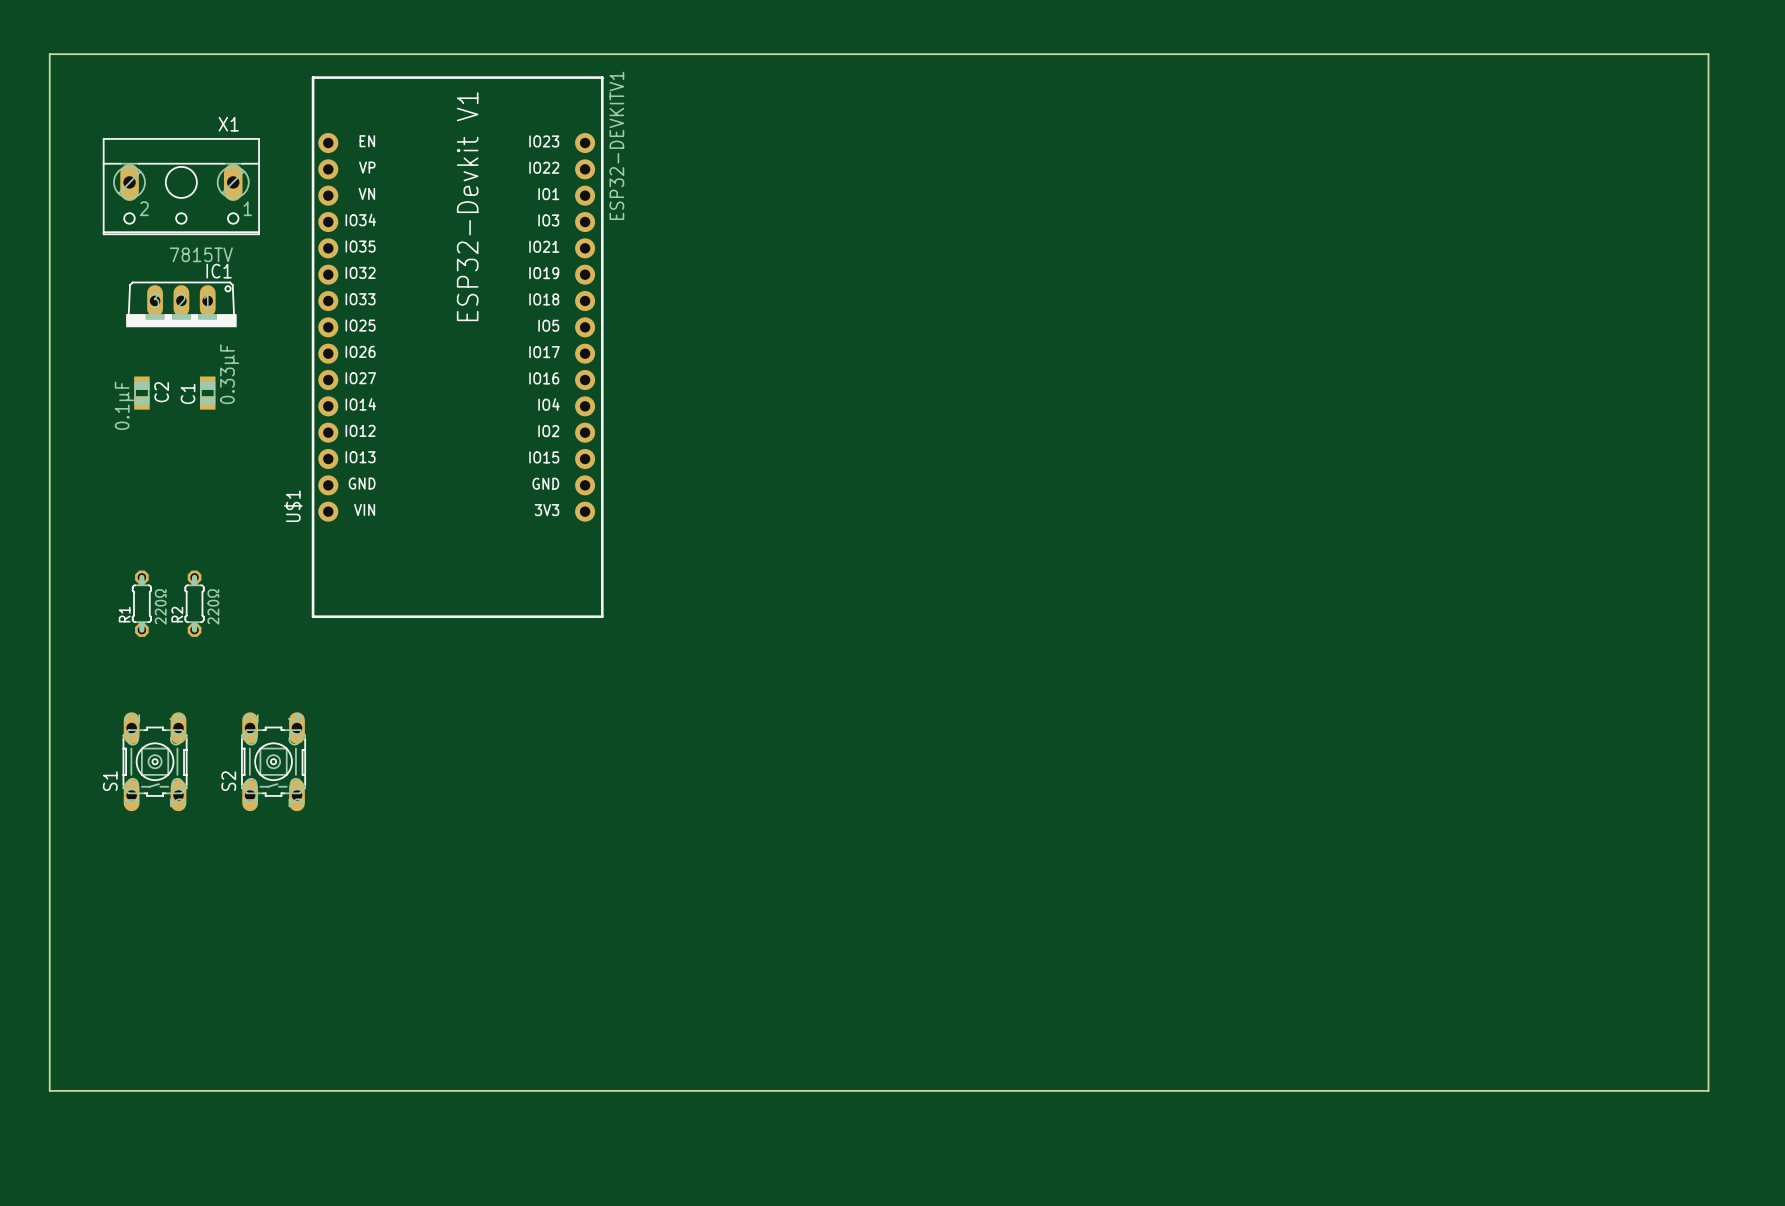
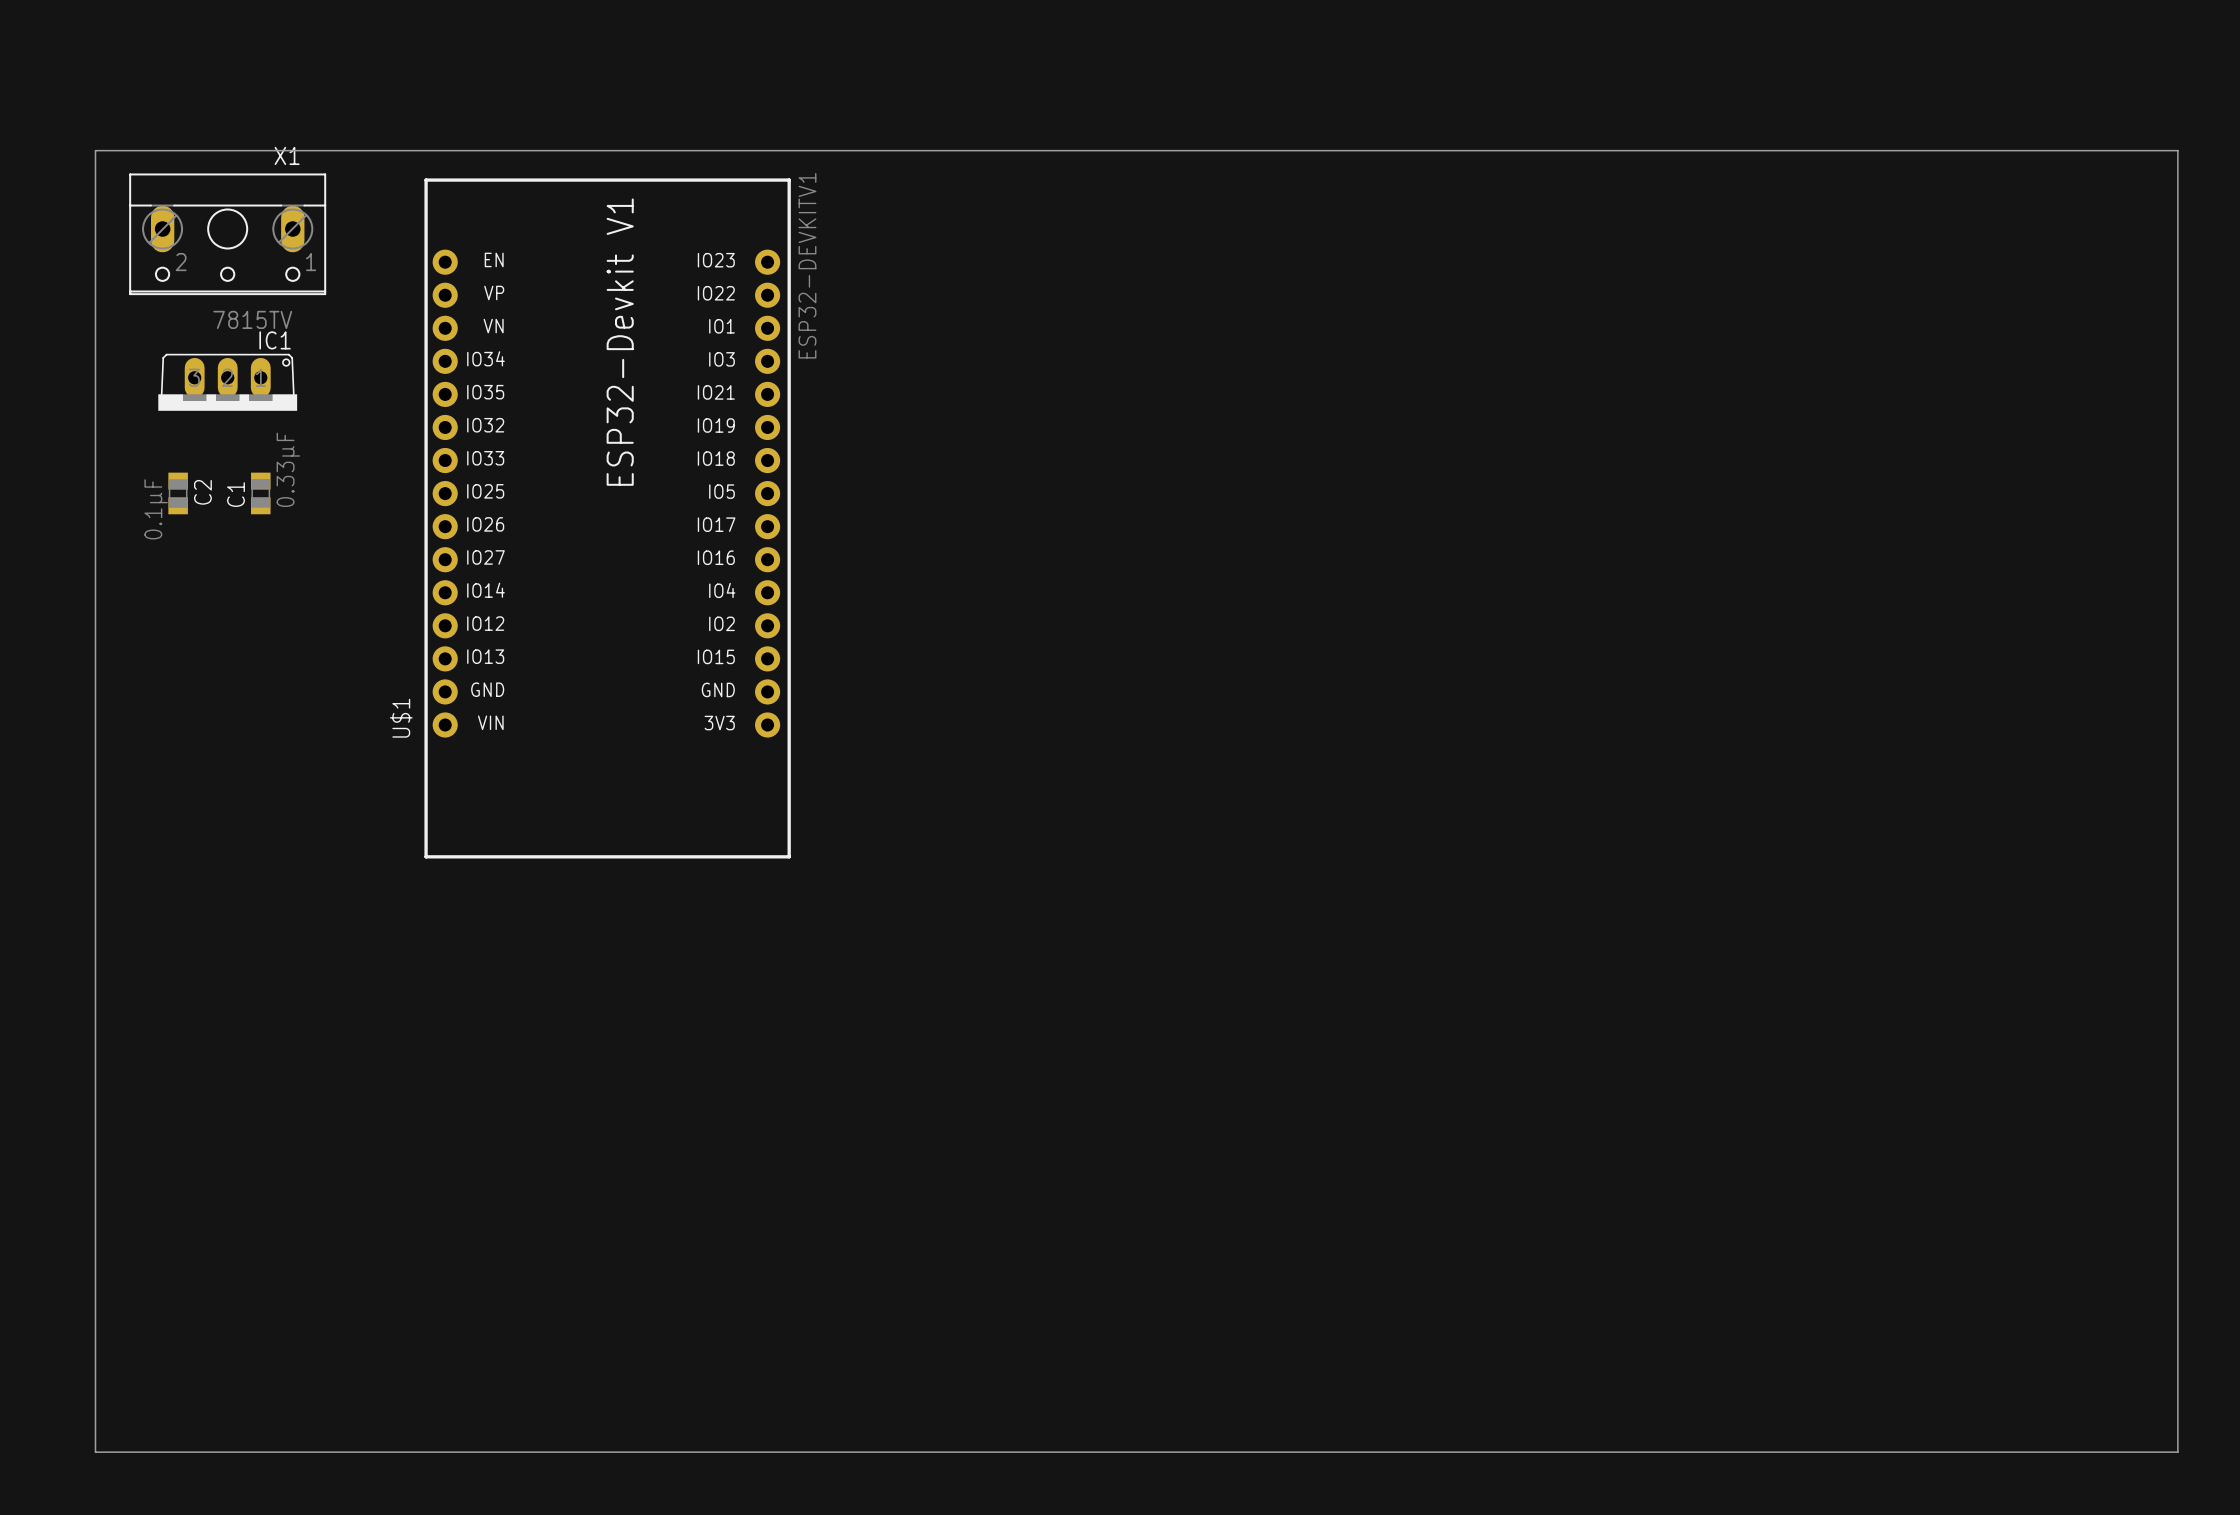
board edge: (49, 54) (1708, 54) (1708, 1090) (49, 1090) (49, 54) -> (95, 150) (95, 1452) (2177, 1452) (2177, 150) (95, 150)
U$1 position: (457, 347) -> (607, 518)
R1: 220Ω (141, 603) -> none
R2: 220Ω (194, 603) -> none
S1: (155, 761) -> none
S2: (273, 761) -> none

